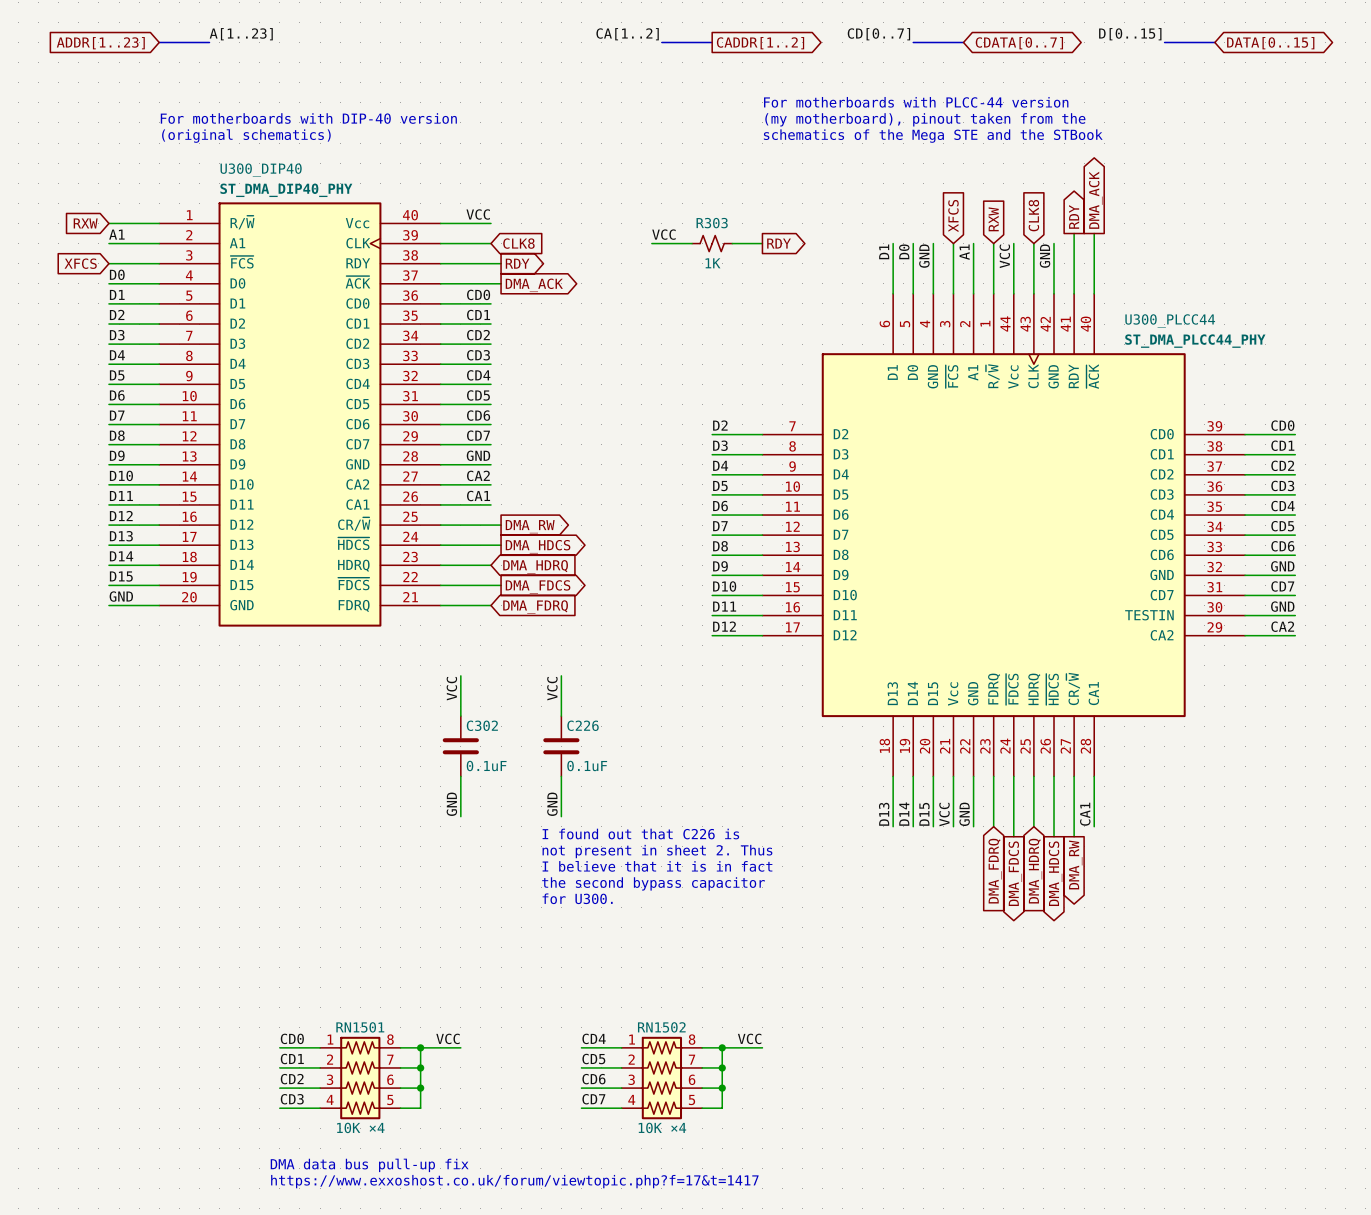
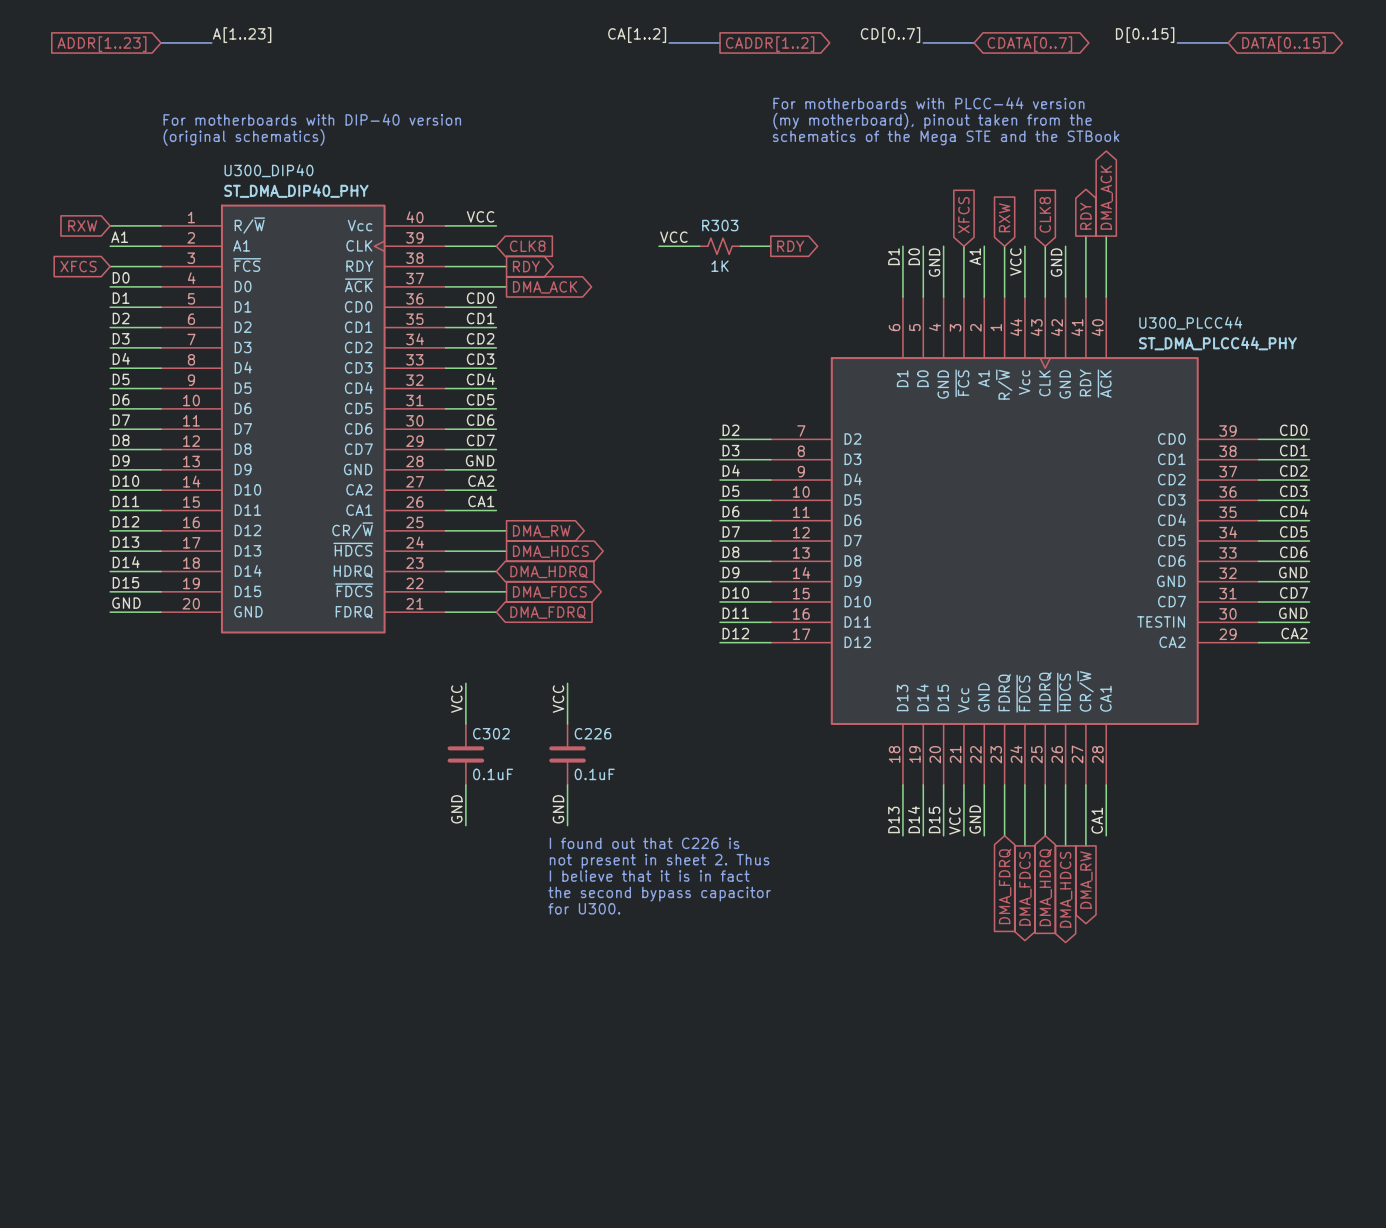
label: CD0 (292, 1038) -> none
label: VCC (448, 1038) -> none
label: CD4 (594, 1038) -> none
label: VCC (749, 1038) -> none
wire: (279, 1047) (320, 1047) -> none
wire: (400, 1047) (460, 1047) -> none
wire: (420, 1047) (420, 1108) (400, 1108) -> none
junction: (420, 1047) -> none
wire: (581, 1047) (621, 1047) -> none
wire: (702, 1047) (762, 1047) -> none
wire: (722, 1047) (722, 1108) (702, 1108) -> none
junction: (722, 1047) -> none
label: CD1 (292, 1059) -> none
label: CD5 (593, 1059) -> none
wire: (279, 1067) (320, 1067) -> none
wire: (400, 1067) (420, 1067) -> none
junction: (420, 1067) -> none
wire: (581, 1067) (621, 1067) -> none
wire: (702, 1067) (722, 1067) -> none
junction: (722, 1067) -> none
RN1501: 10K ×4 (360, 1078) -> none
RN1502: 10K ×4 (661, 1078) -> none
label: CD2 (292, 1079) -> none
label: CD6 (593, 1079) -> none
wire: (279, 1088) (320, 1088) -> none
wire: (400, 1088) (420, 1088) -> none
junction: (420, 1088) -> none
wire: (581, 1088) (621, 1088) -> none
wire: (702, 1088) (722, 1088) -> none
junction: (722, 1088) -> none
label: CD3 (292, 1099) -> none
label: CD7 (593, 1099) -> none
wire: (279, 1108) (320, 1108) -> none
wire: (581, 1108) (621, 1108) -> none
text: DMA data bus pull-up fix (369, 1165) -> none
text: https://www.exxoshost.co.uk/forum/viewtopic.php?f=17&t=1417 (514, 1181) -> none

